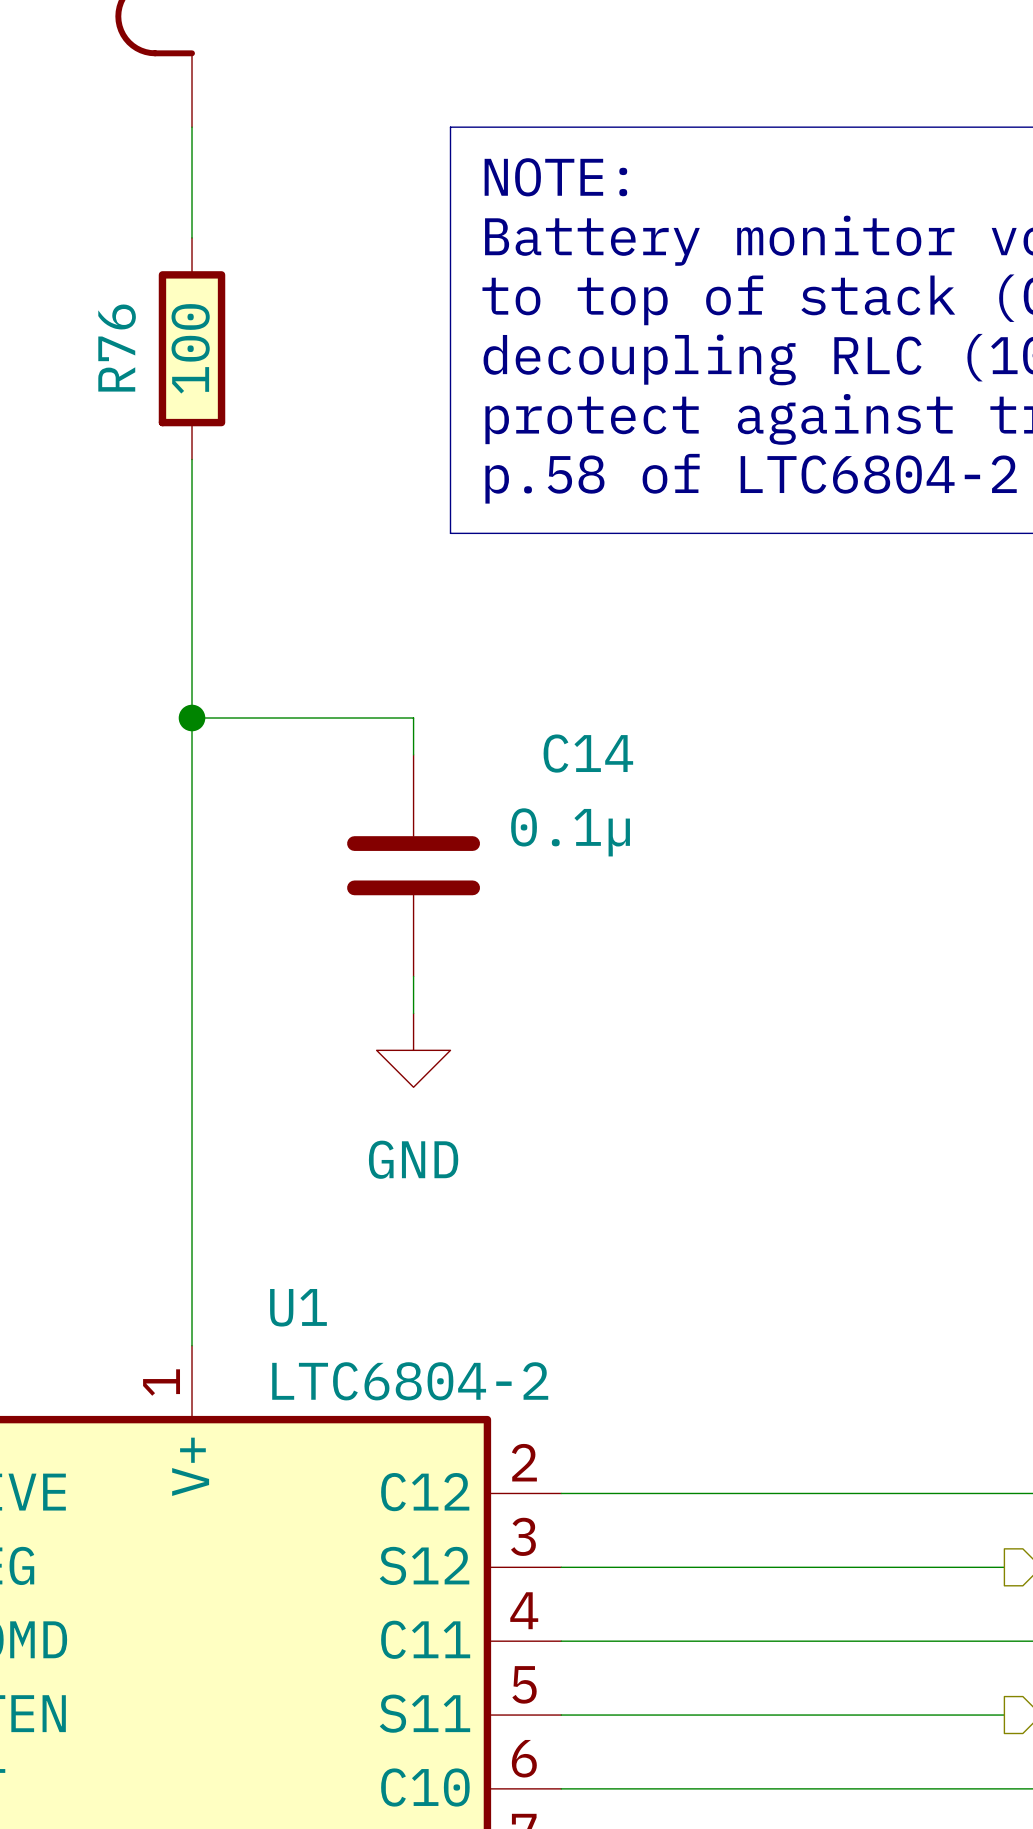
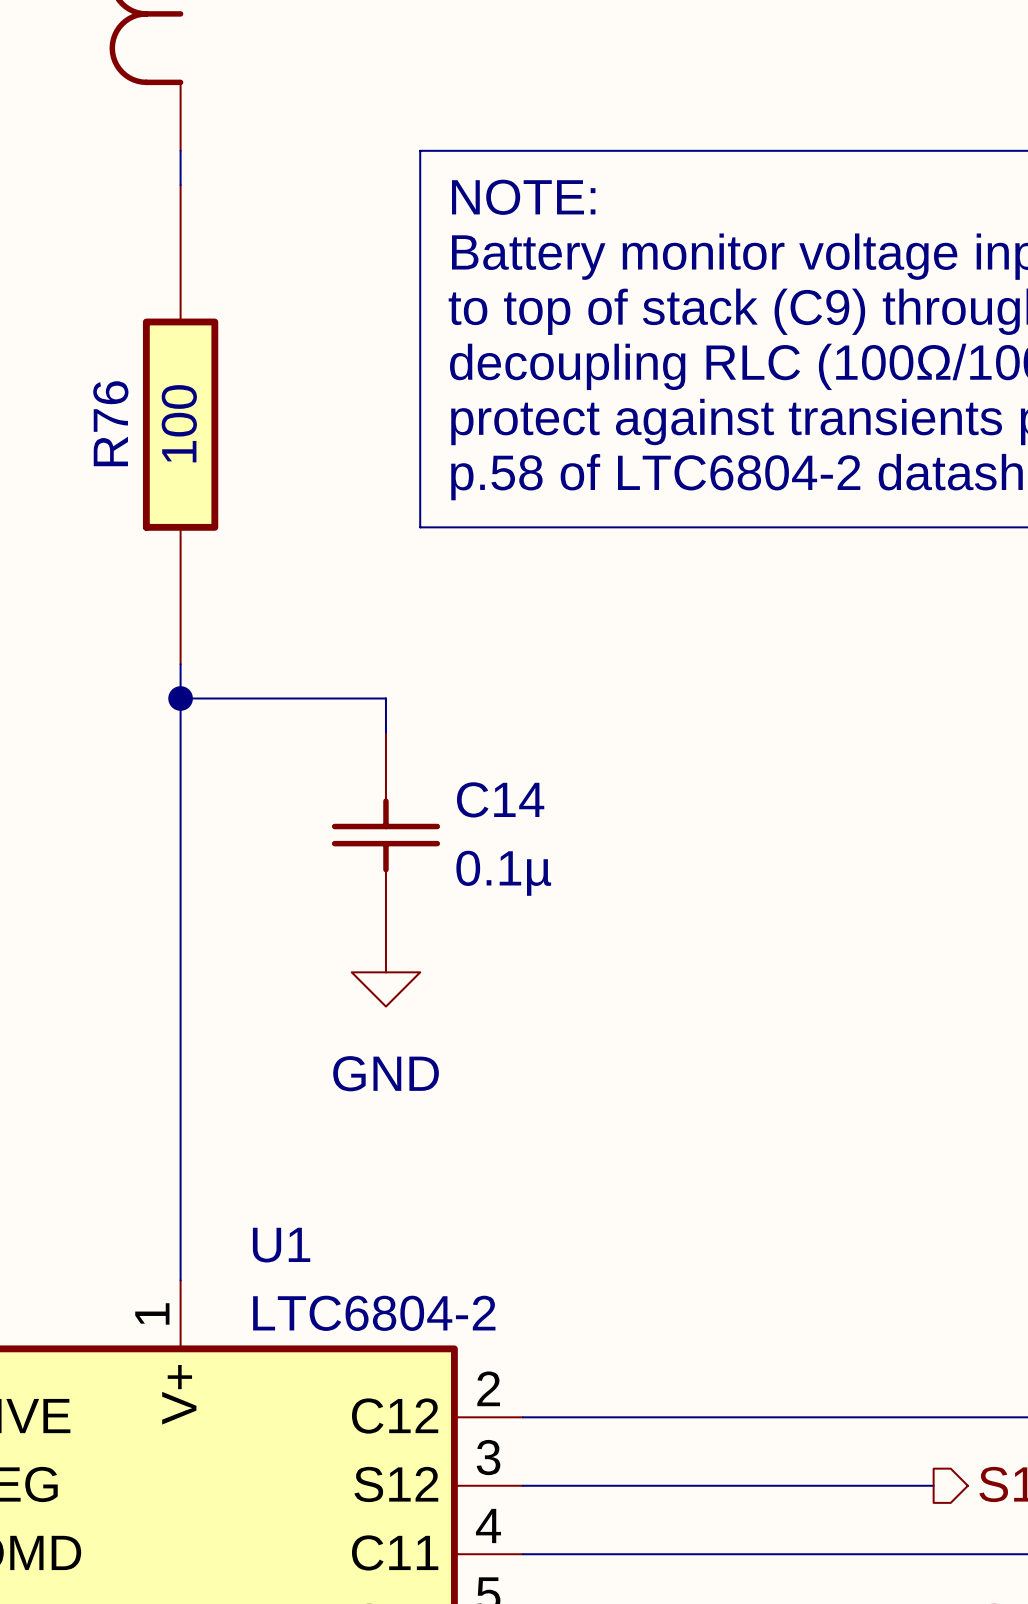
R76 symbol: [158, 237, 226, 460] -> [142, 185, 219, 665]
C14 name position: C14 (588, 753) -> C14 (500, 799)
C14 symbol: [347, 754, 481, 977] -> [331, 732, 441, 939]
C14 value position: 0.1µ (570, 832) -> 0.1µ (503, 873)
power symbol position: GND (413, 1050) -> GND (385, 972)

